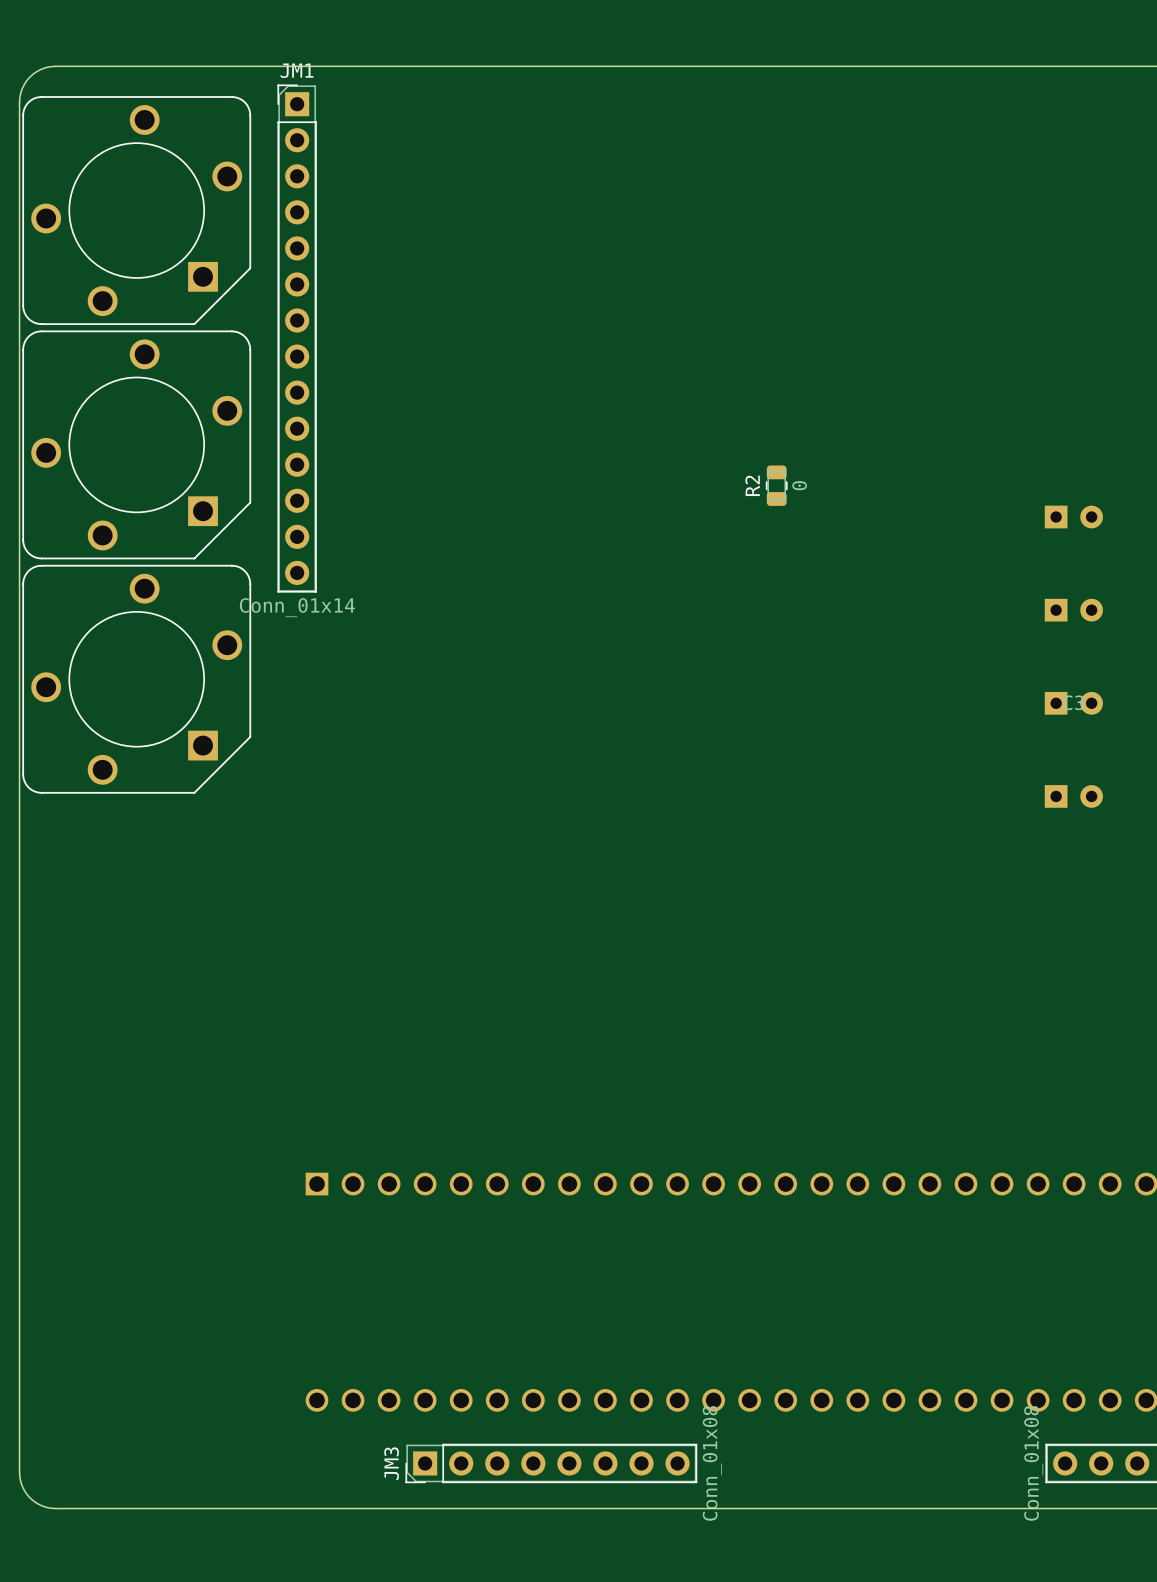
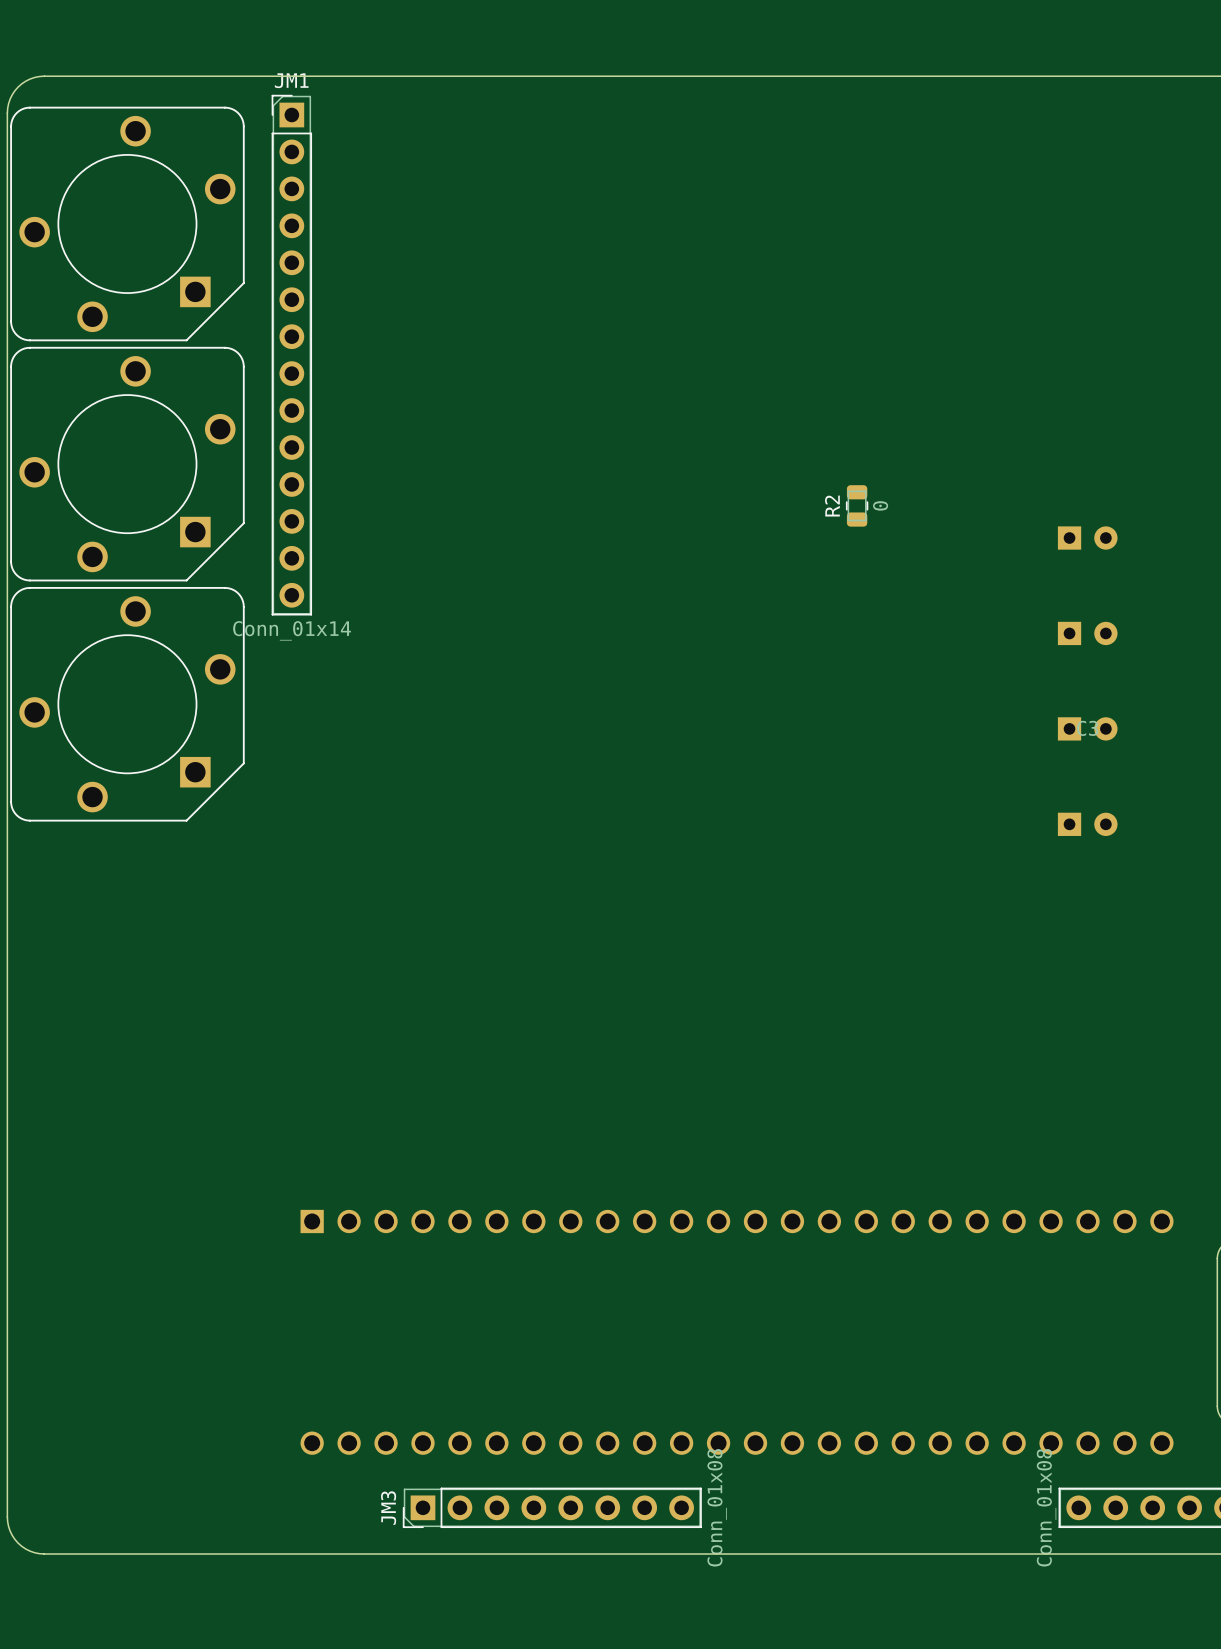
R2 position: (776, 485) -> (857, 505)

